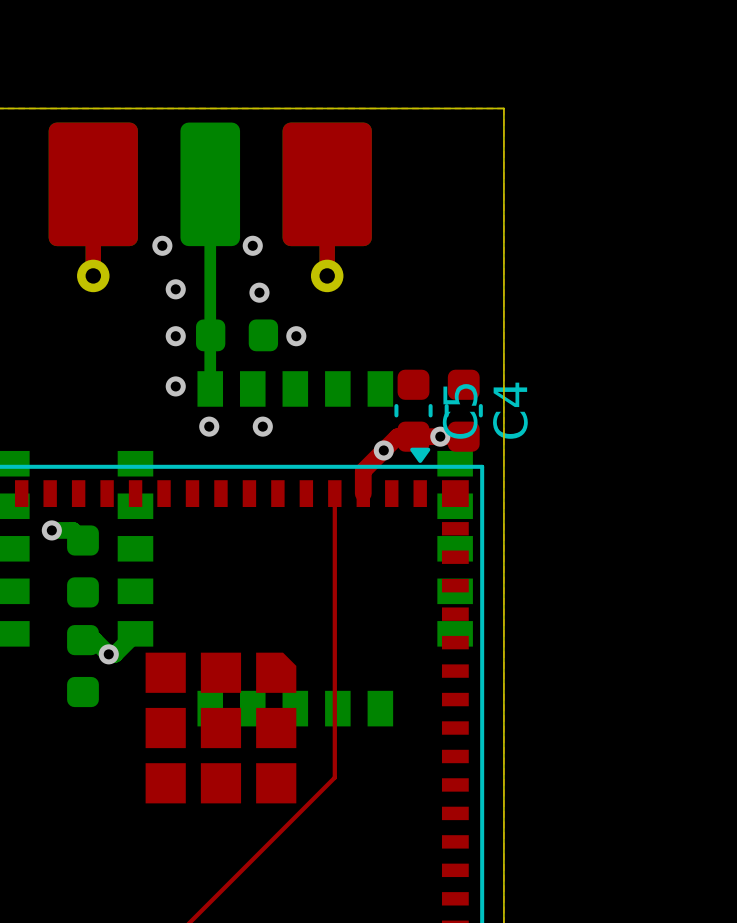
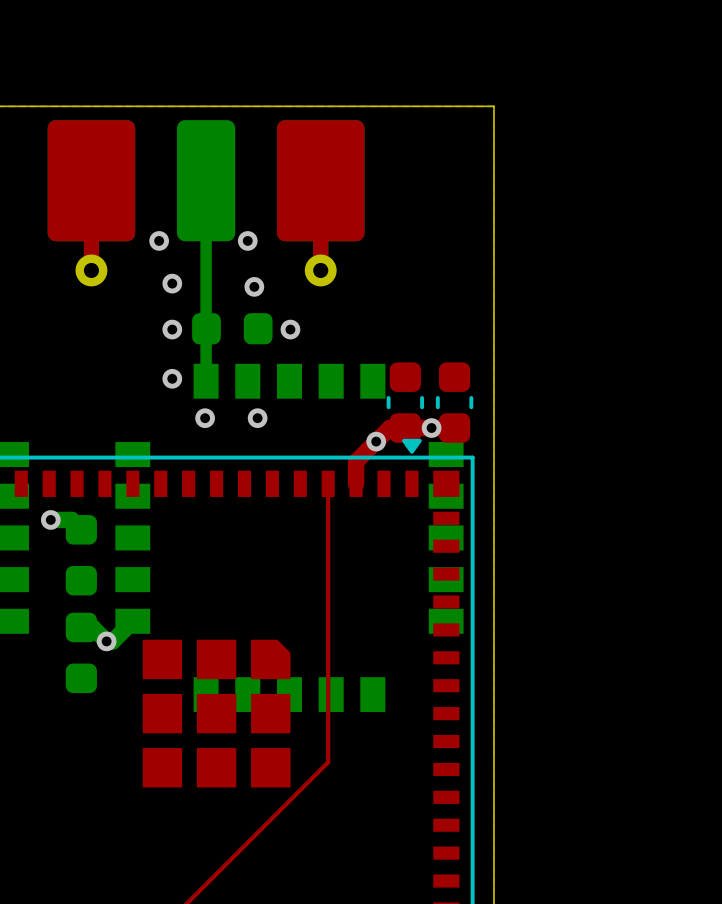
C4 name: C4 (510, 410) -> none
C5 name: C5 (460, 411) -> none

